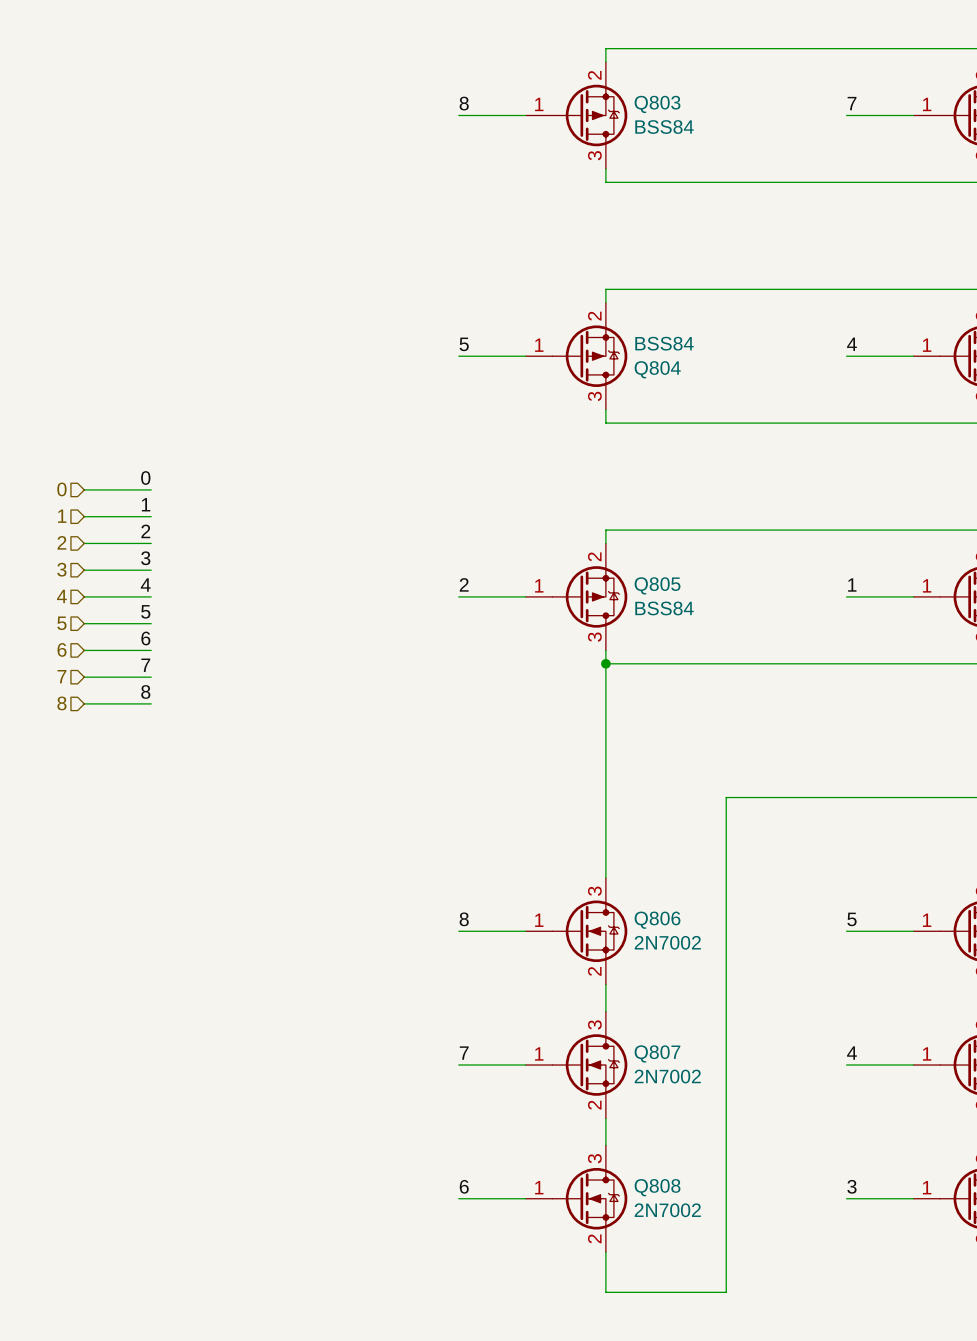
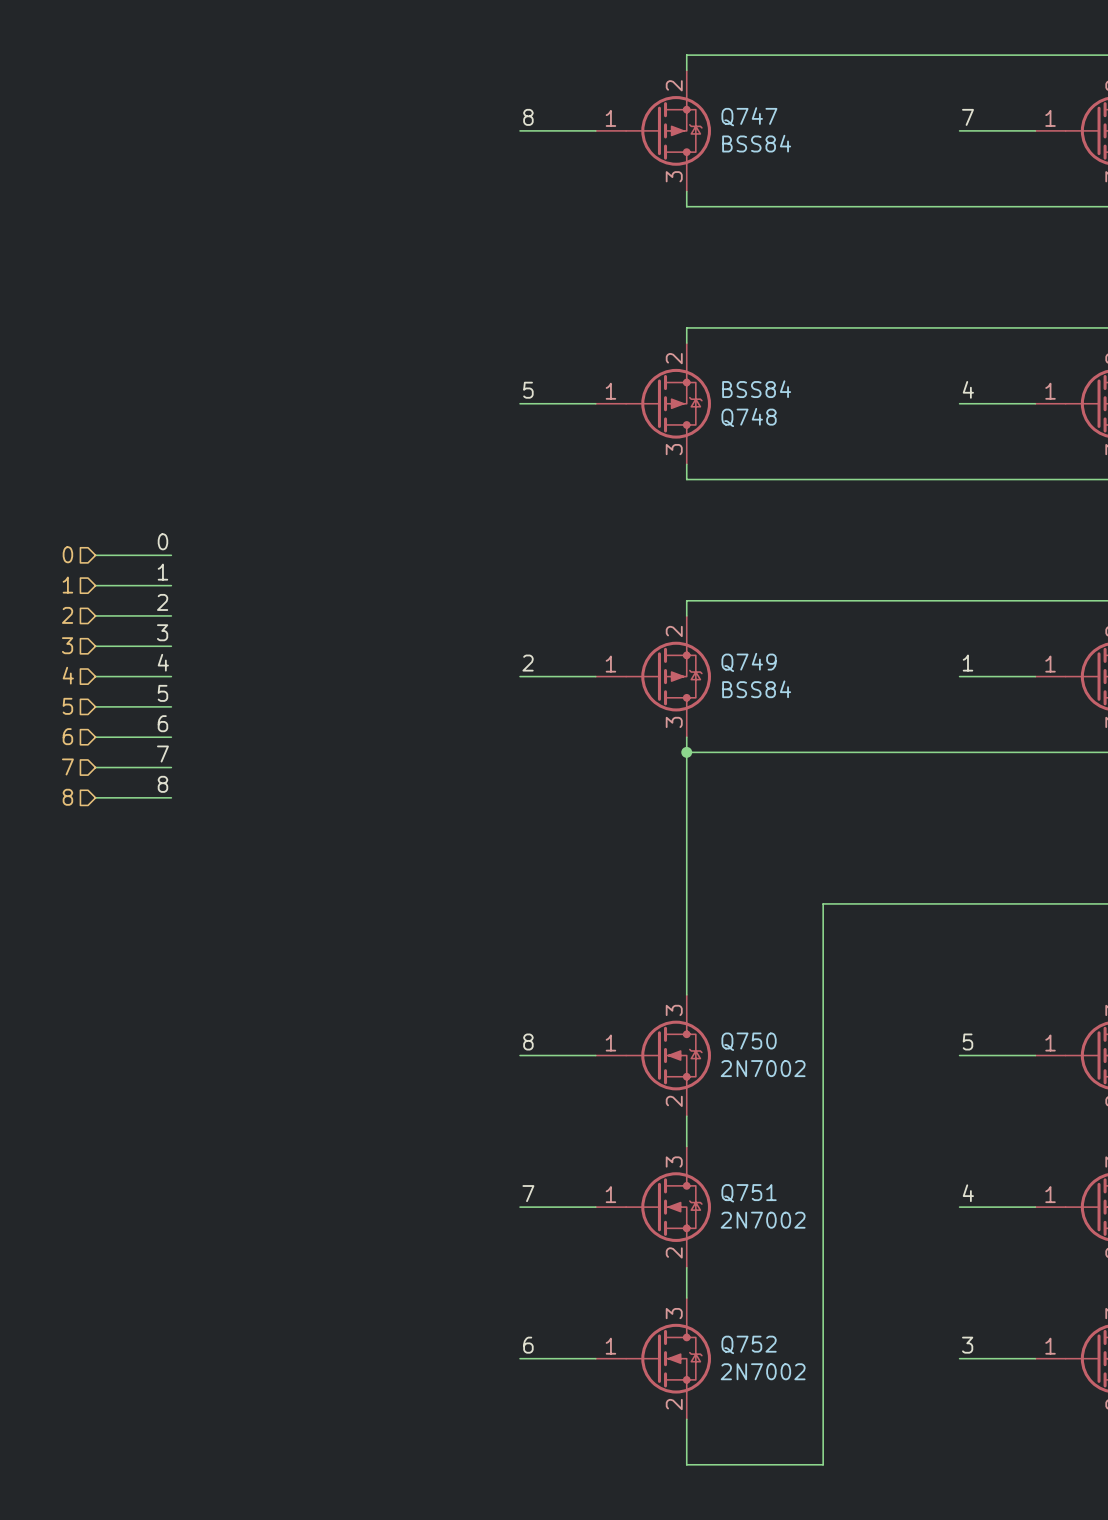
Q803 name: Q803 (657, 104) -> Q747 (749, 116)
Q804 name: Q804 (657, 369) -> Q748 (749, 417)
Q805 name: Q805 (657, 585) -> Q749 (749, 662)
Q806 name: Q806 (657, 920) -> Q750 (749, 1041)
Q807 name: Q807 (657, 1053) -> Q751 (749, 1193)
Q808 name: Q808 (657, 1187) -> Q752 (749, 1344)

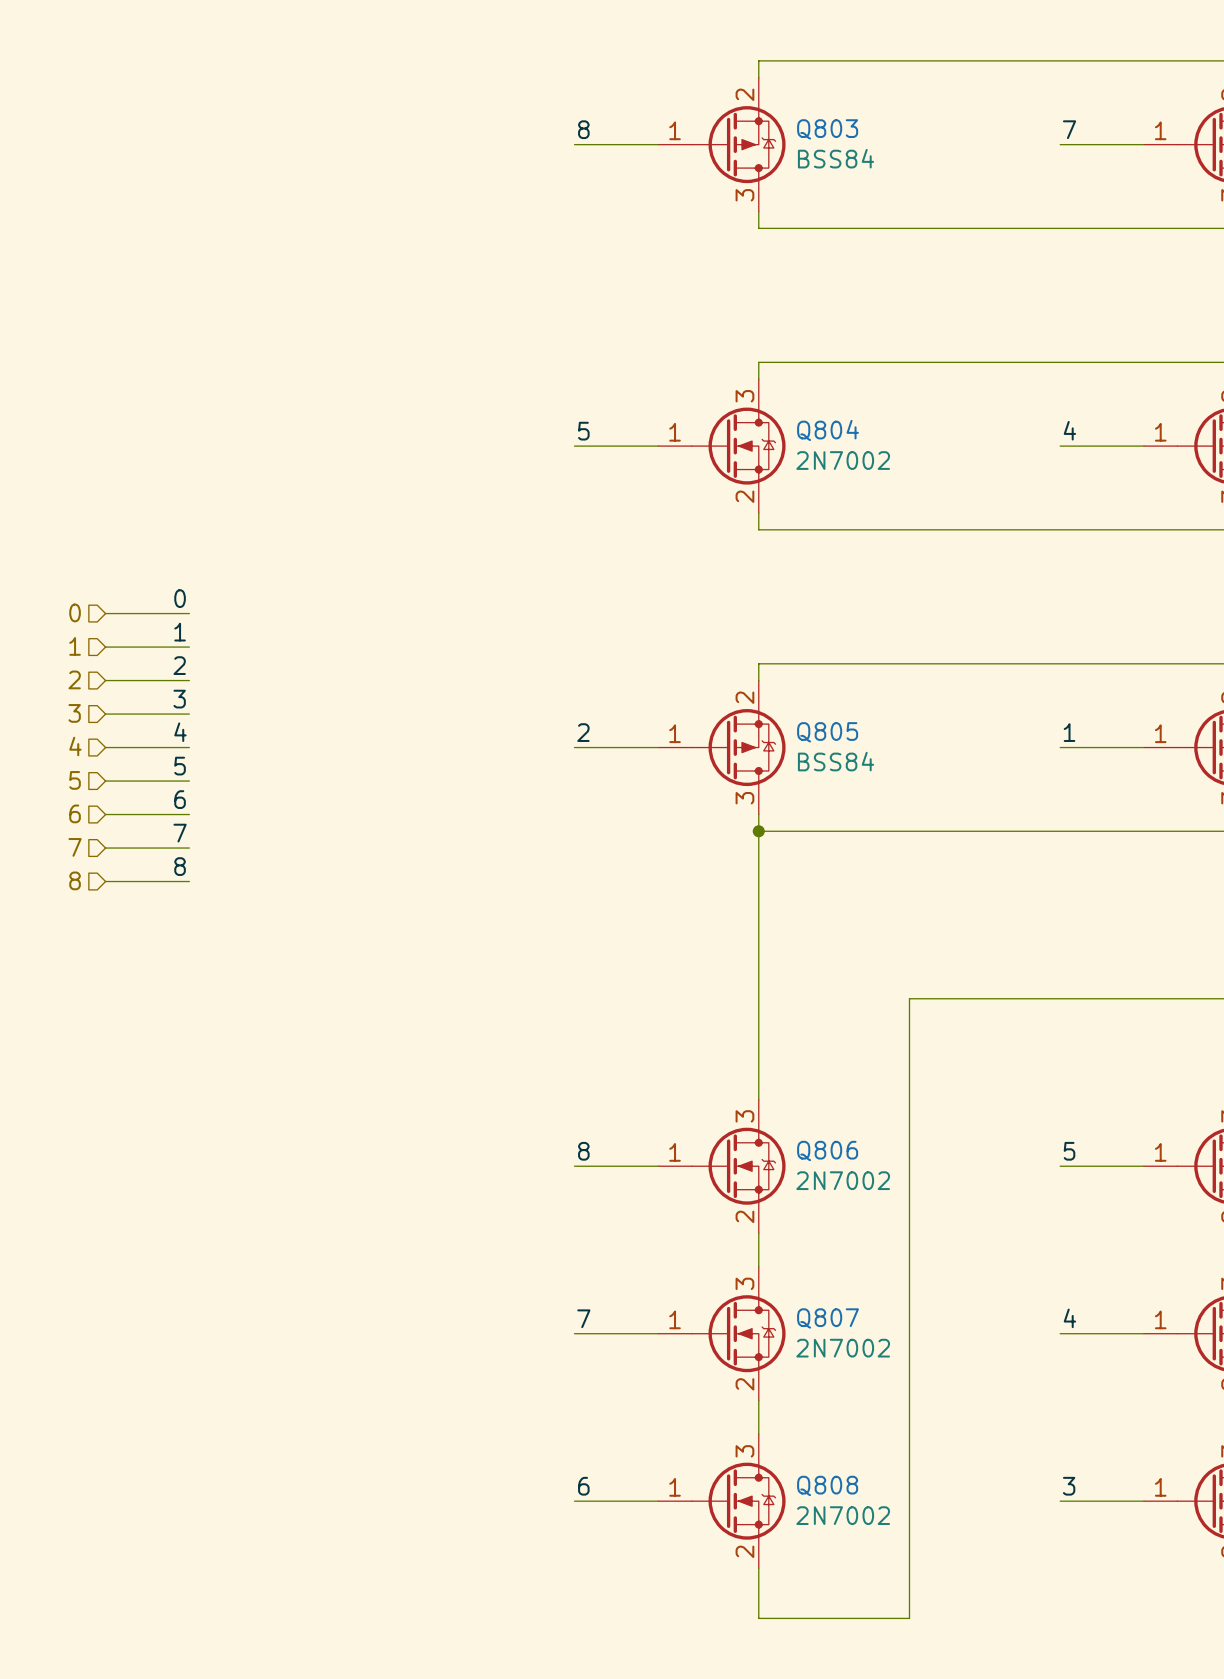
Q747 name: Q747 (749, 116) -> Q803 (827, 129)
Q748: BSS84 (653, 403) -> none
Q804: none -> 2N7002 (721, 446)
Q749 name: Q749 (749, 662) -> Q805 (827, 732)
Q750 name: Q750 (749, 1041) -> Q806 (827, 1150)
Q751 name: Q751 (749, 1193) -> Q807 (828, 1318)
Q752 name: Q752 (749, 1344) -> Q808 (827, 1485)

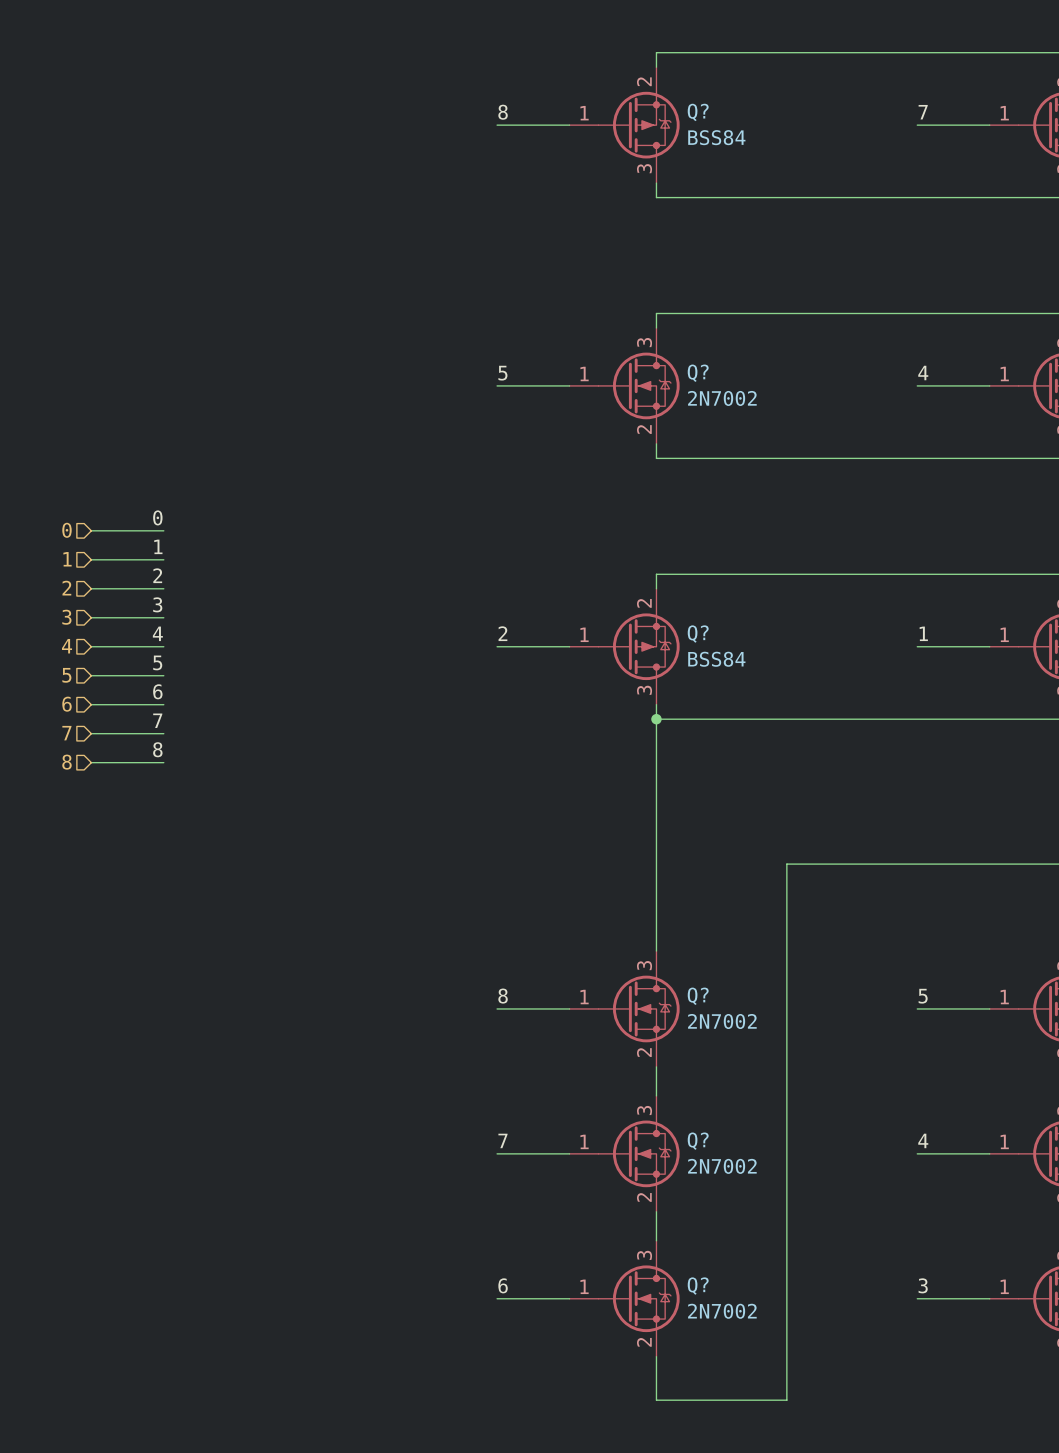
Q803 name: Q803 (827, 129) -> Q? (698, 112)
Q804 name: Q804 (828, 430) -> Q? (698, 373)
Q805 name: Q805 (827, 732) -> Q? (698, 634)
Q806 name: Q806 (827, 1150) -> Q? (698, 996)
Q807 name: Q807 (828, 1318) -> Q? (698, 1141)
Q808 name: Q808 (827, 1485) -> Q? (698, 1286)

